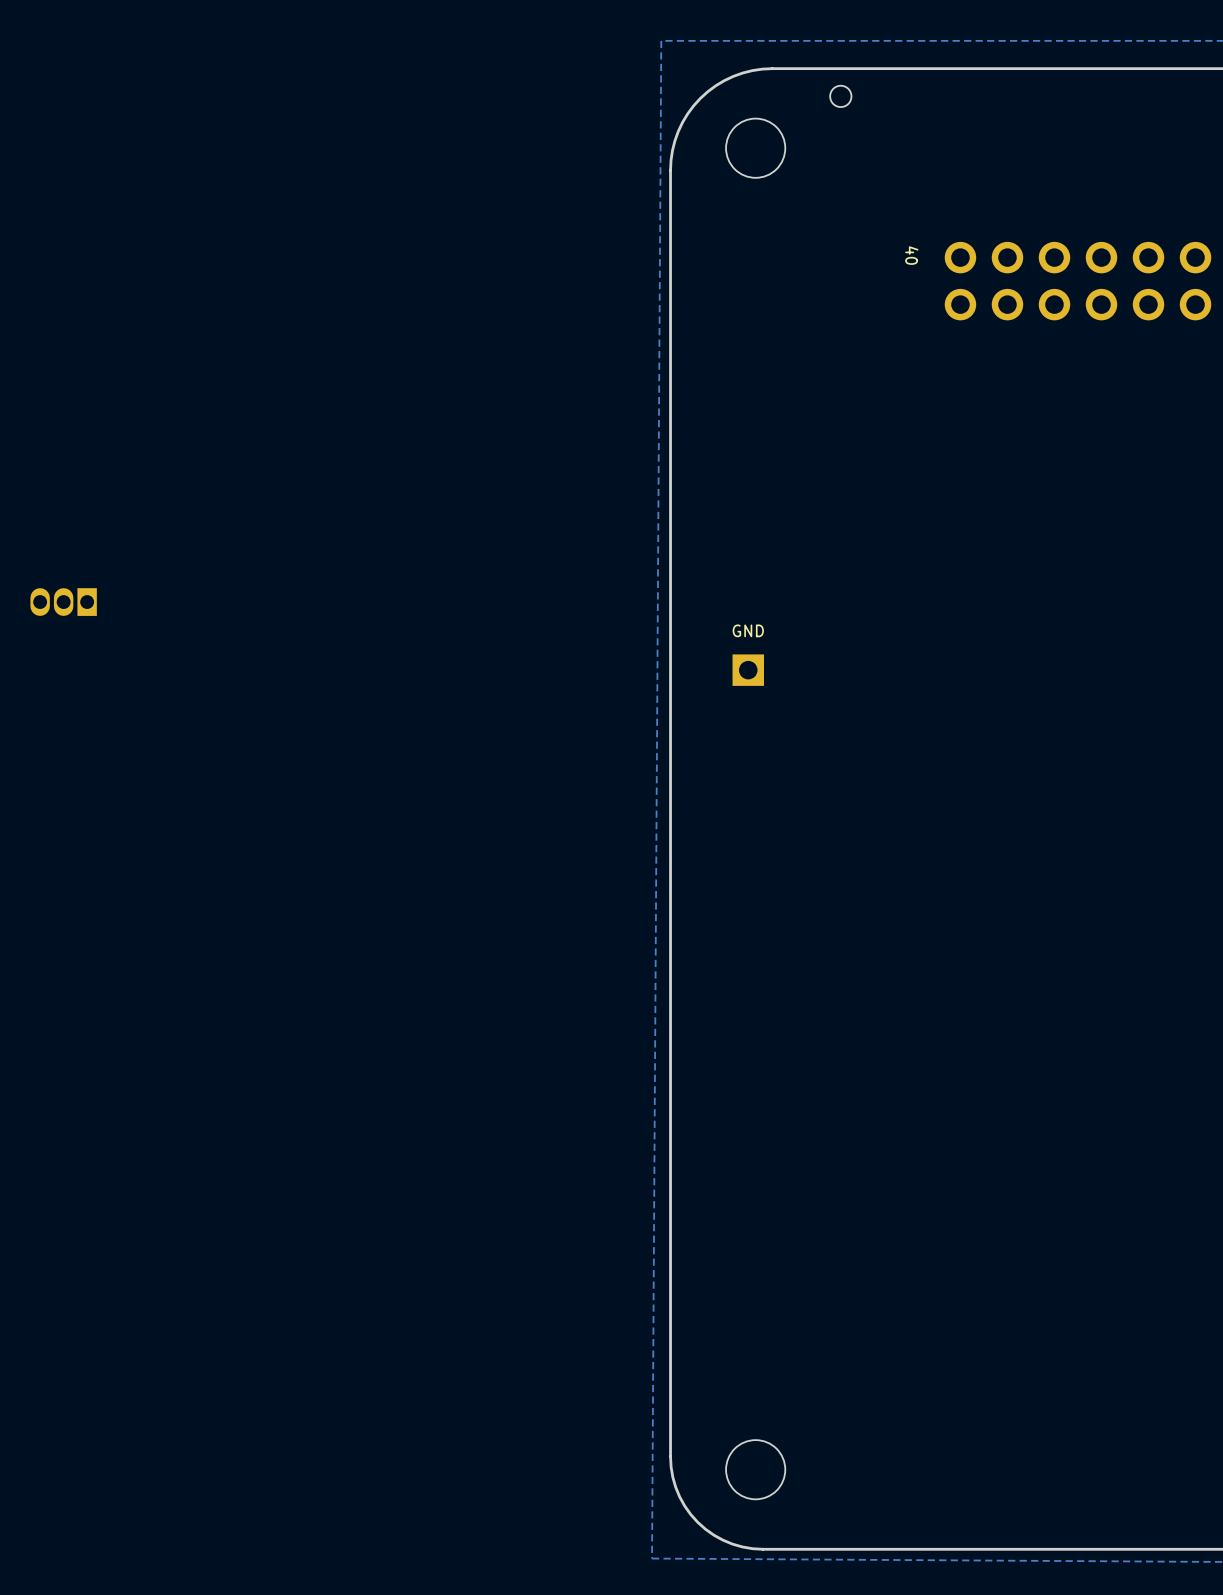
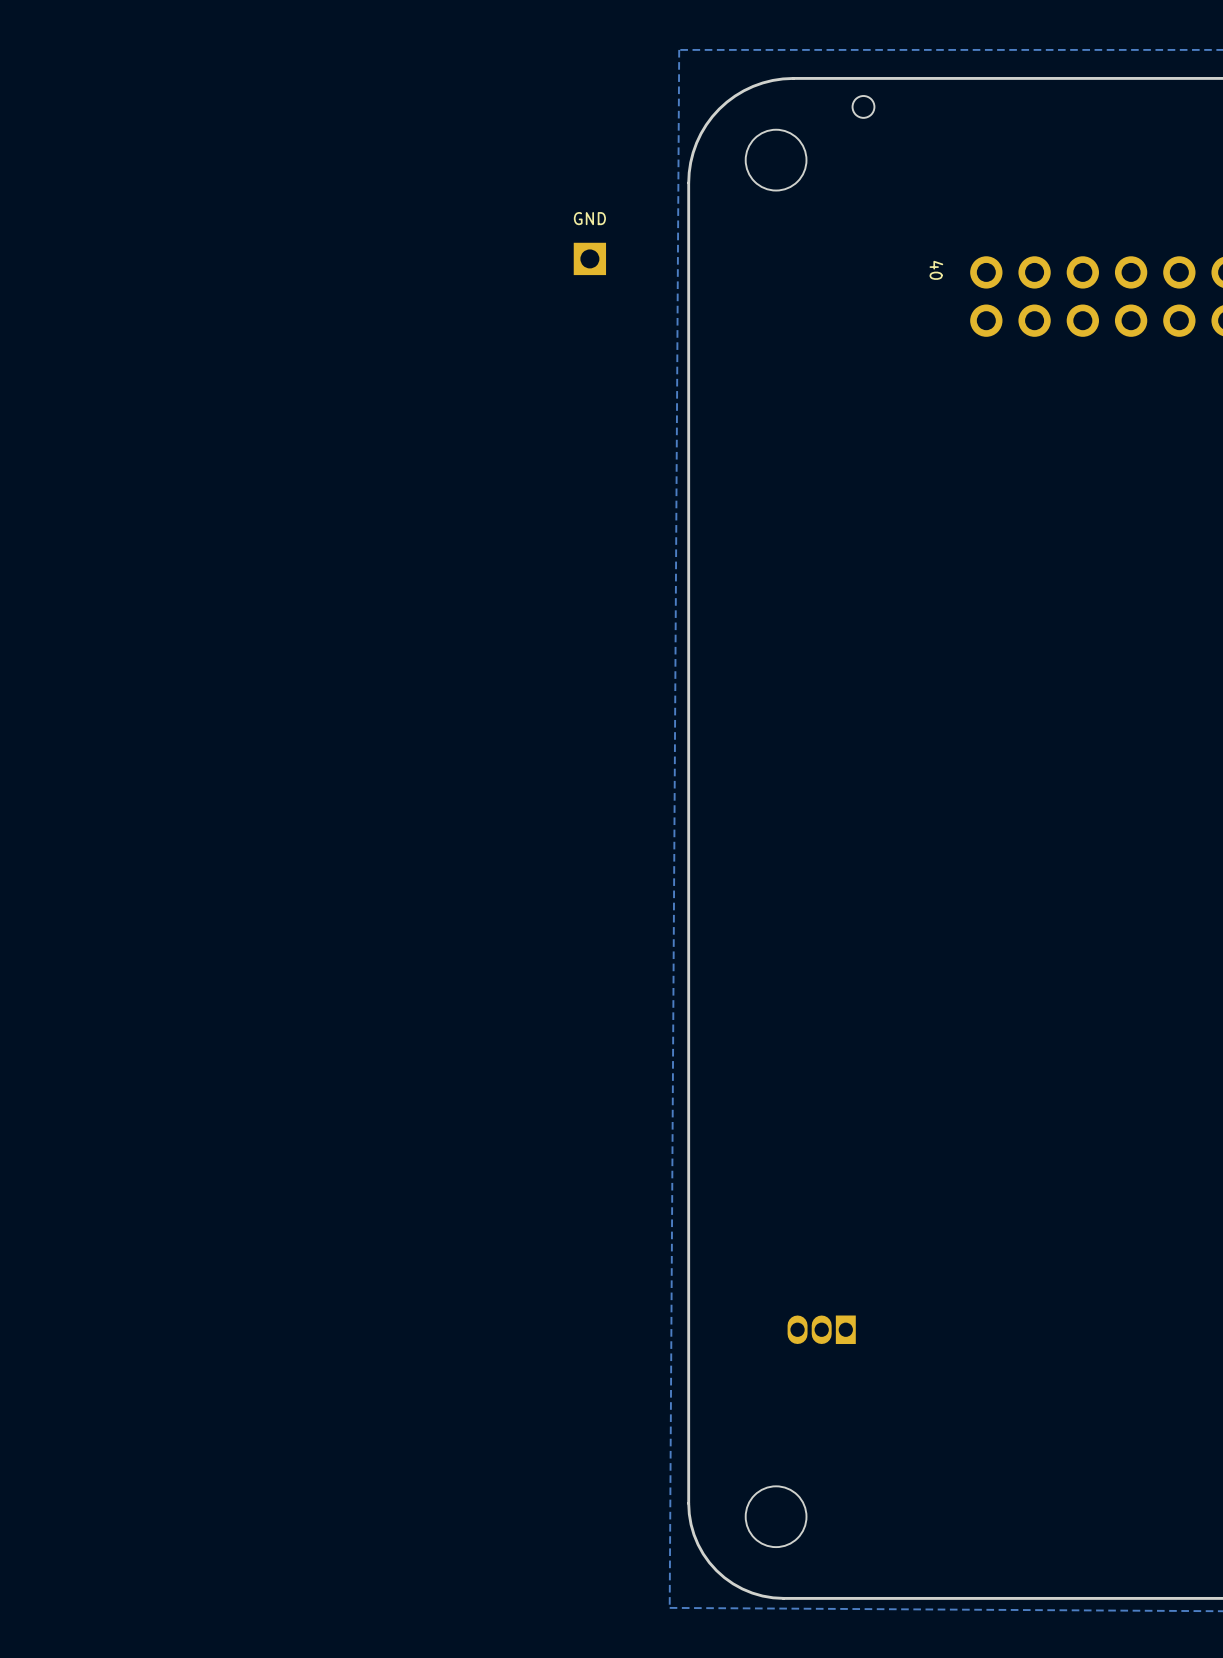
part: (63, 602) -> none
text position: GND (748, 630) -> GND (589, 218)
part position: (748, 670) -> (589, 258)
part: none -> (821, 1329)

